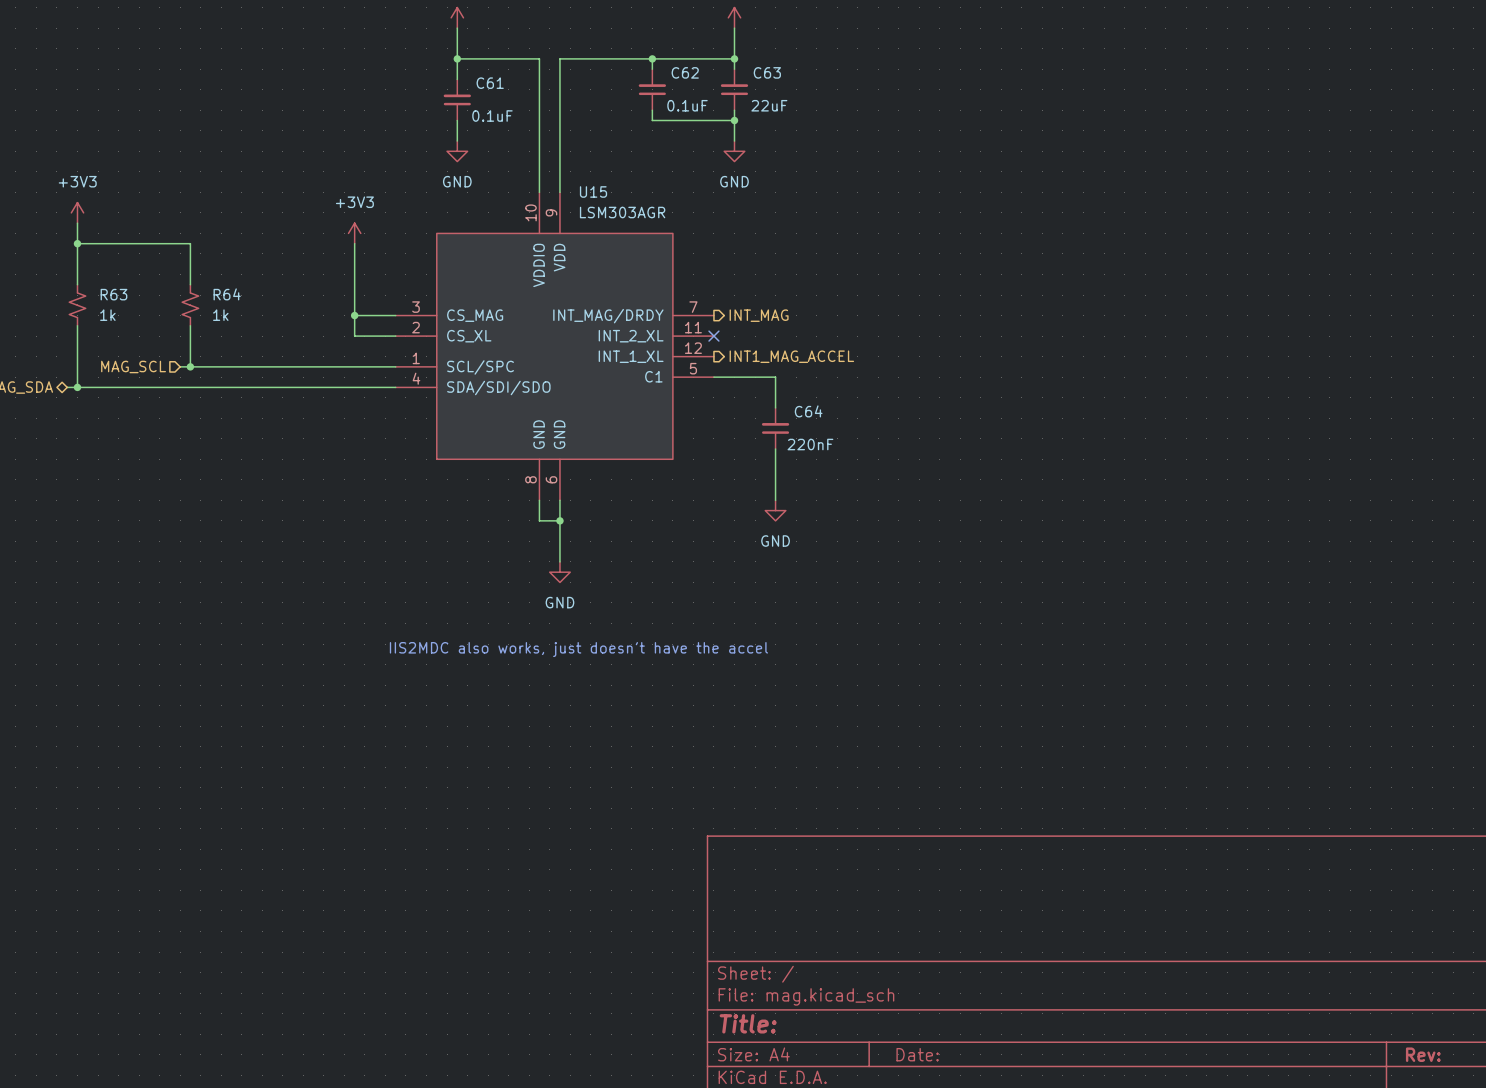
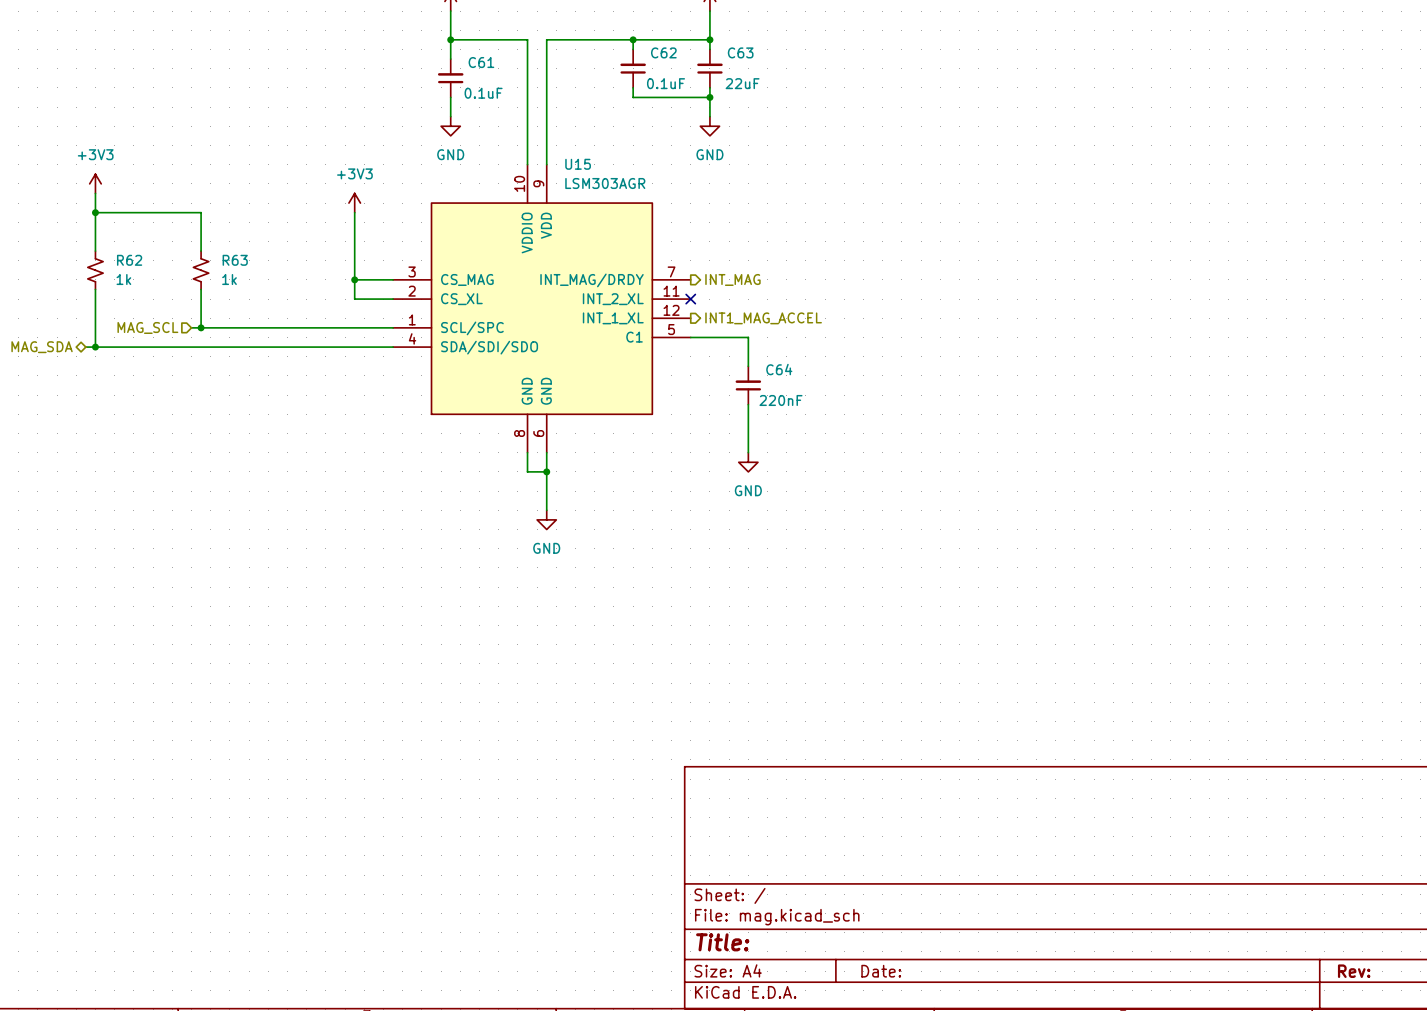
R63 name: R63 (113, 294) -> R62 (129, 260)
R64 name: R64 (227, 294) -> R63 (235, 260)
text: IIS2MDC also works, just doesn't have the accel (578, 649) -> none

